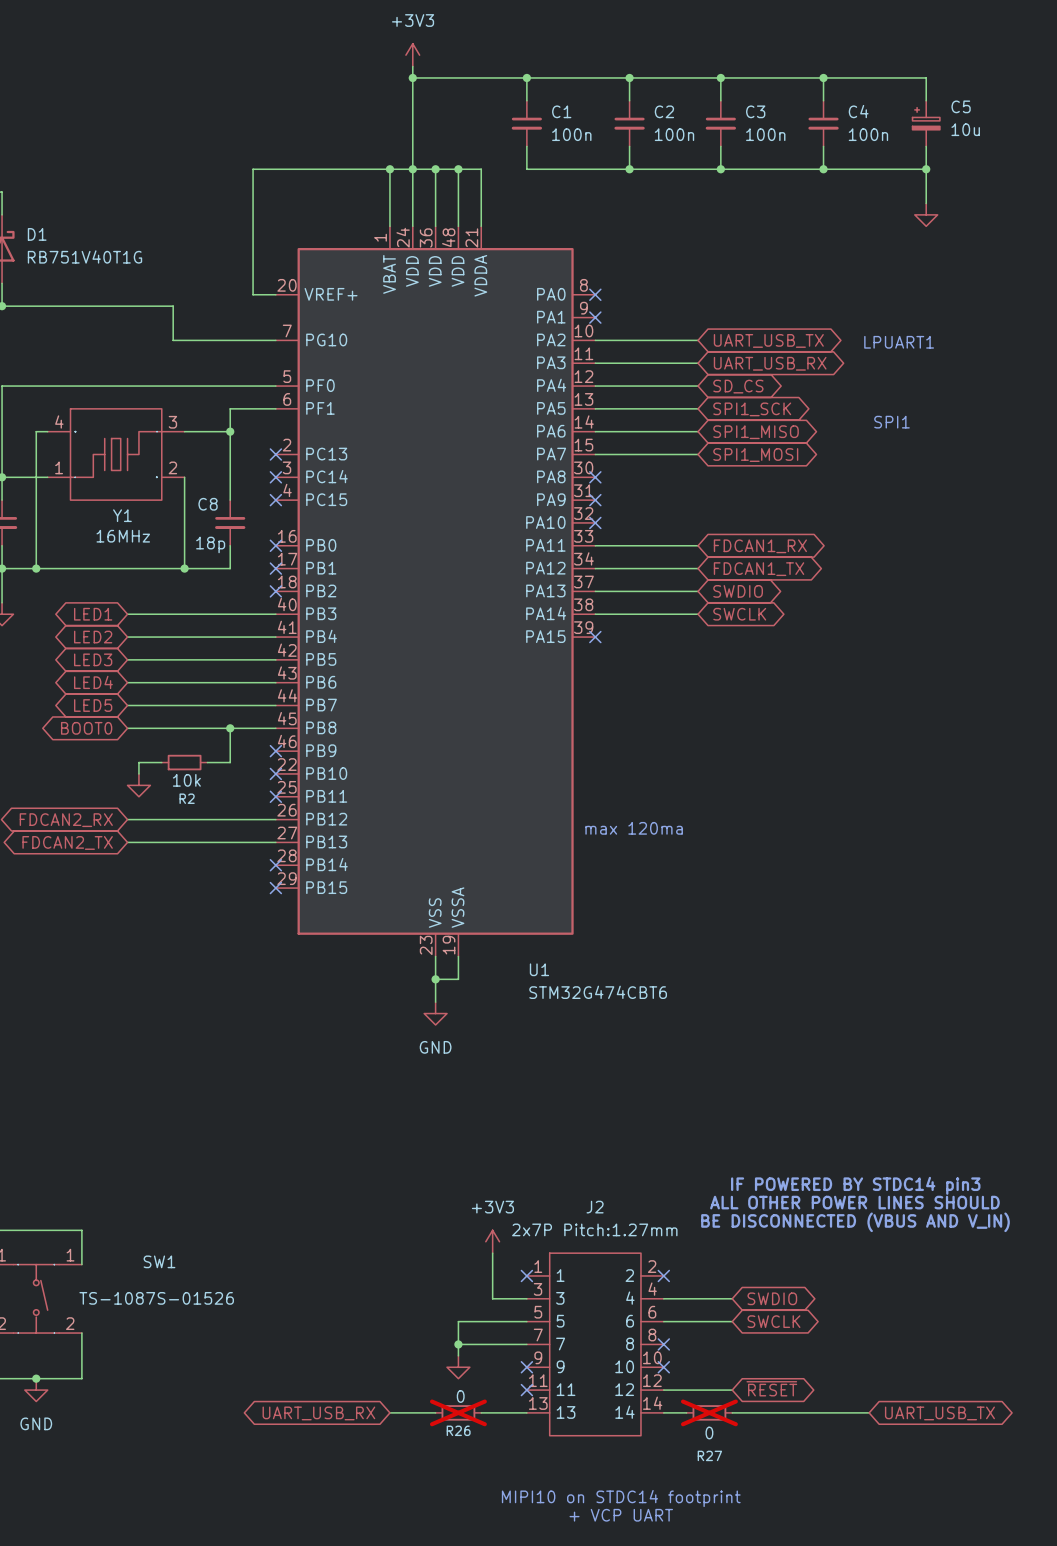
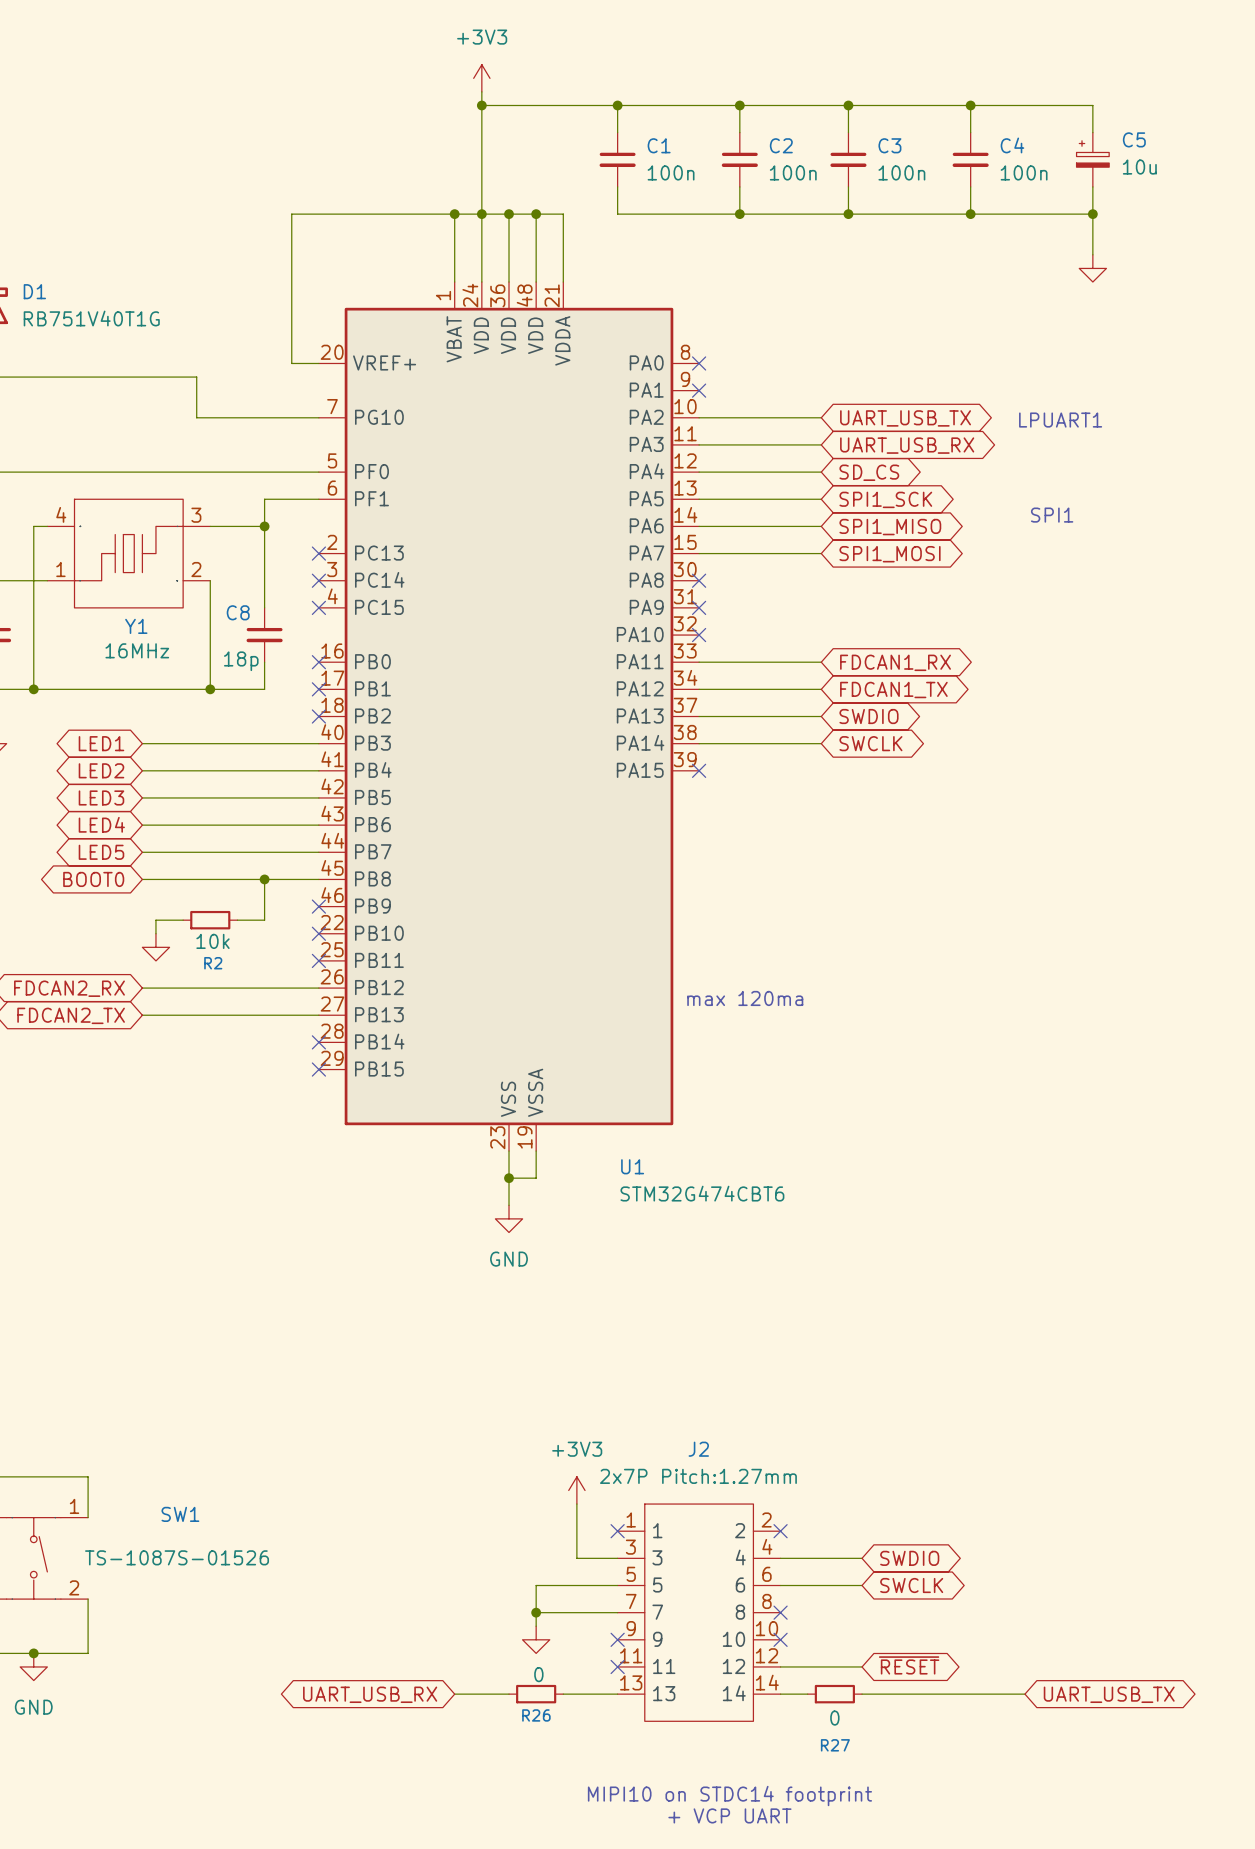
text: IF POWERED BY STDC14 pin3 (855, 1185) -> none
text: ALL OTHER POWER LINES SHOULD (854, 1202) -> none
text: BE DISCONNECTED (VBUS AND V_IN) (855, 1222) -> none
R26 do-not-place cross: (458, 1412) -> none
R27 do-not-place cross: (709, 1412) -> none

